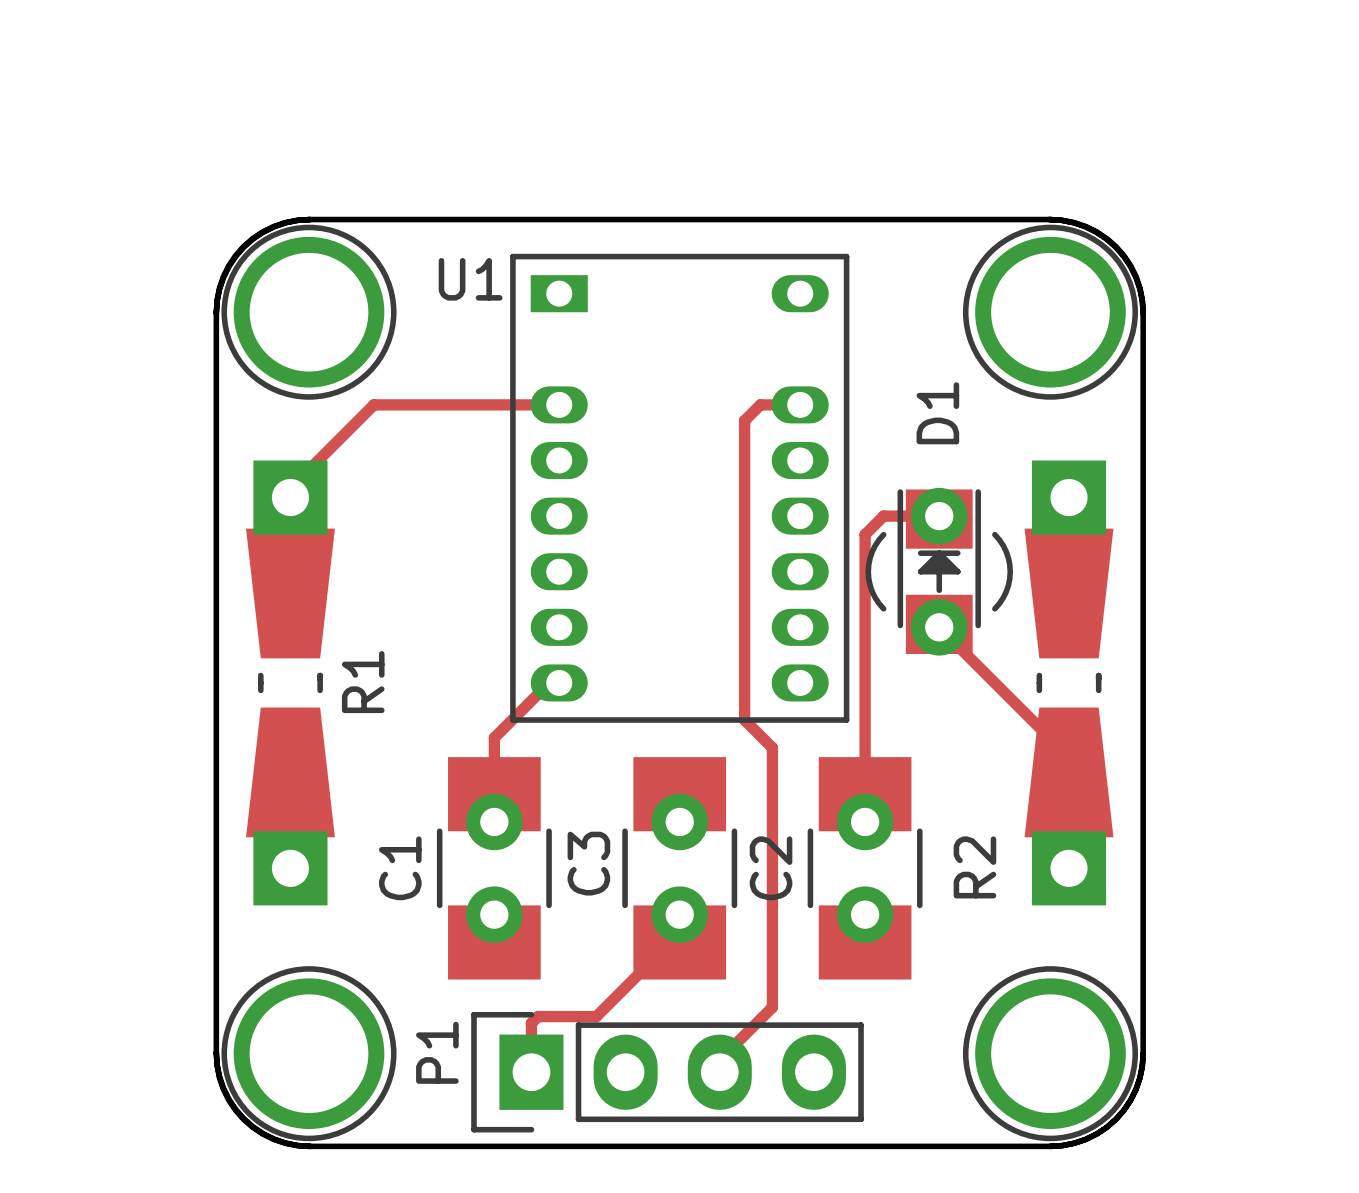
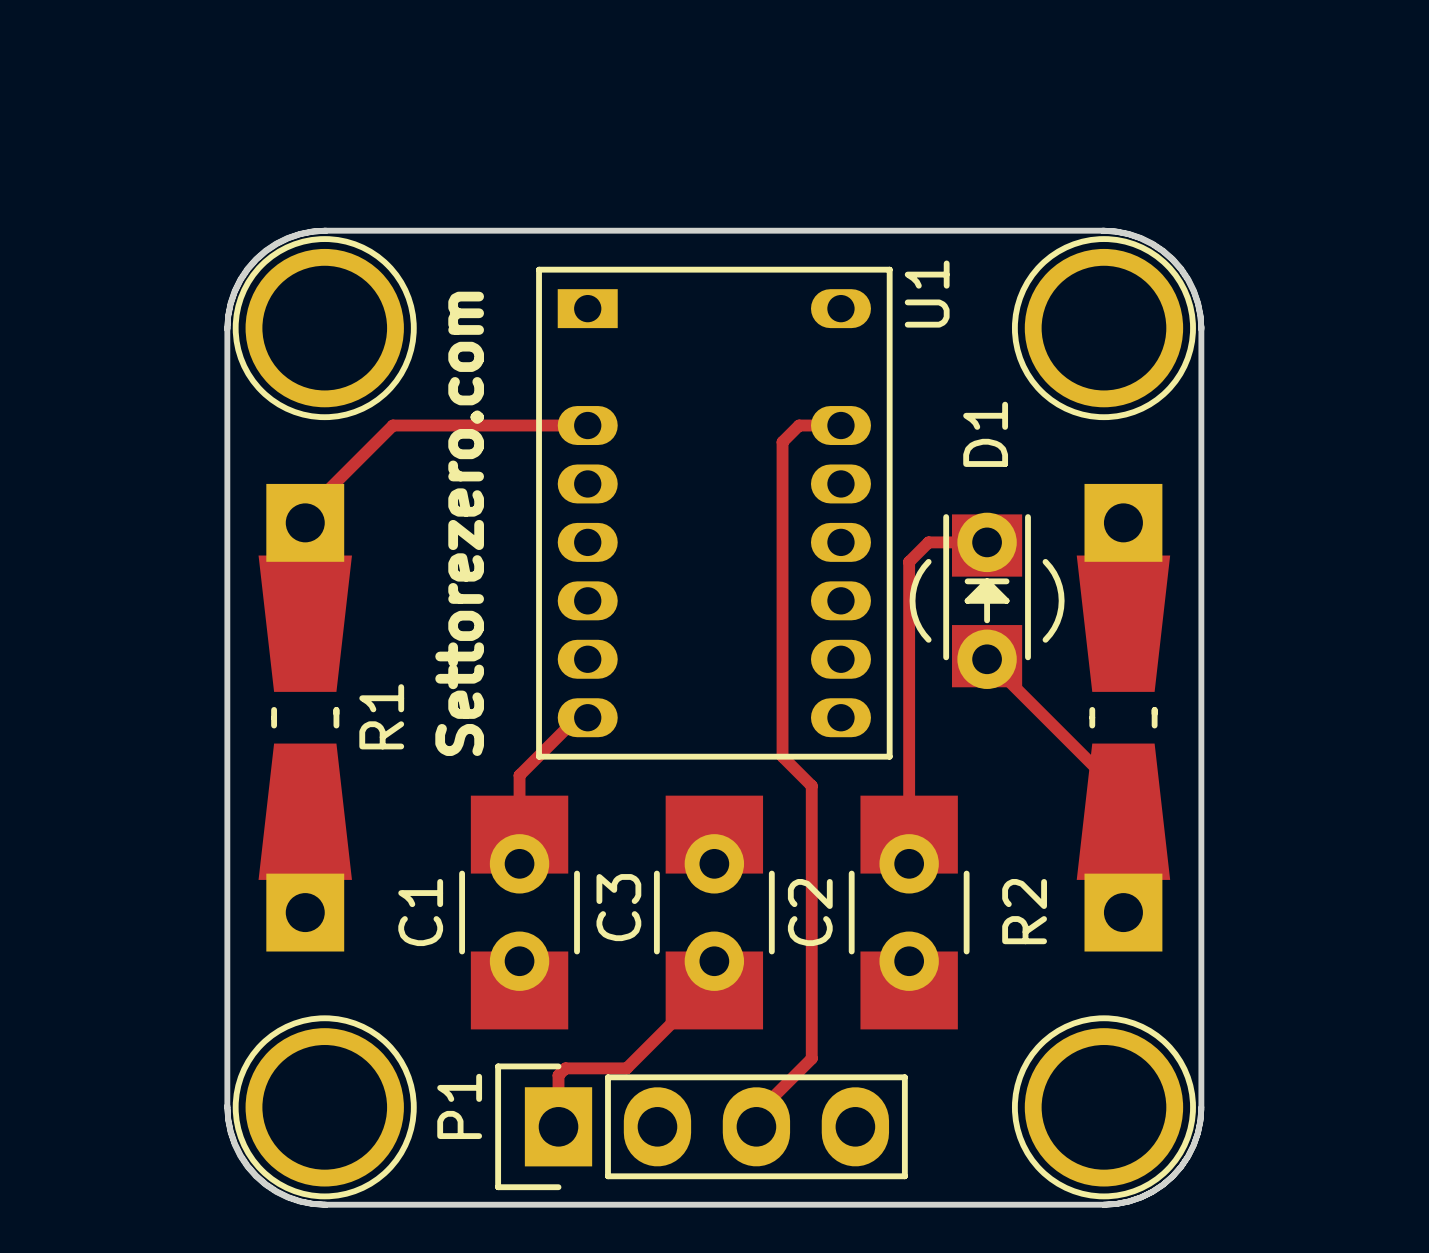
U1 name rotation: 0° (470, 279) -> 90° counterclockwise (927, 294)
U1 name position: U1 (470, 279) -> U1 (927, 294)
text: none -> Settorezero.com (459, 523)

